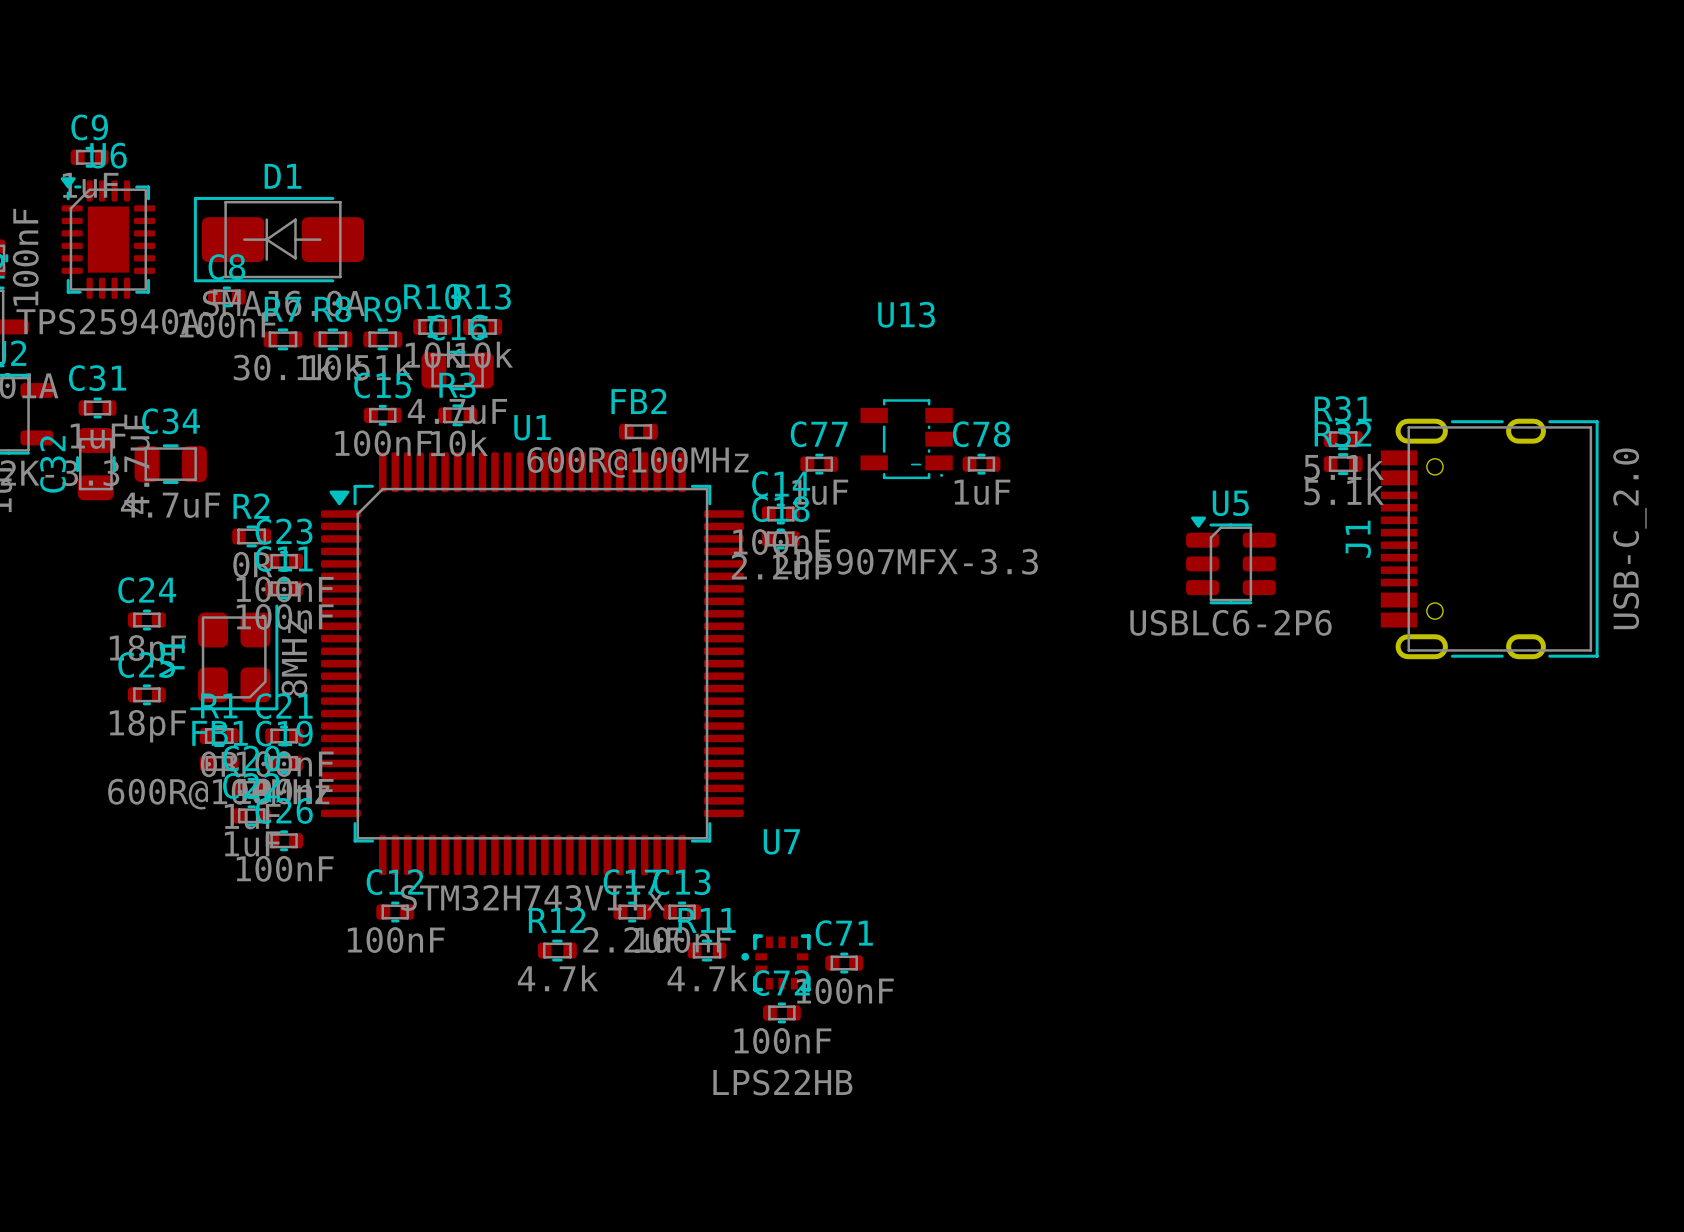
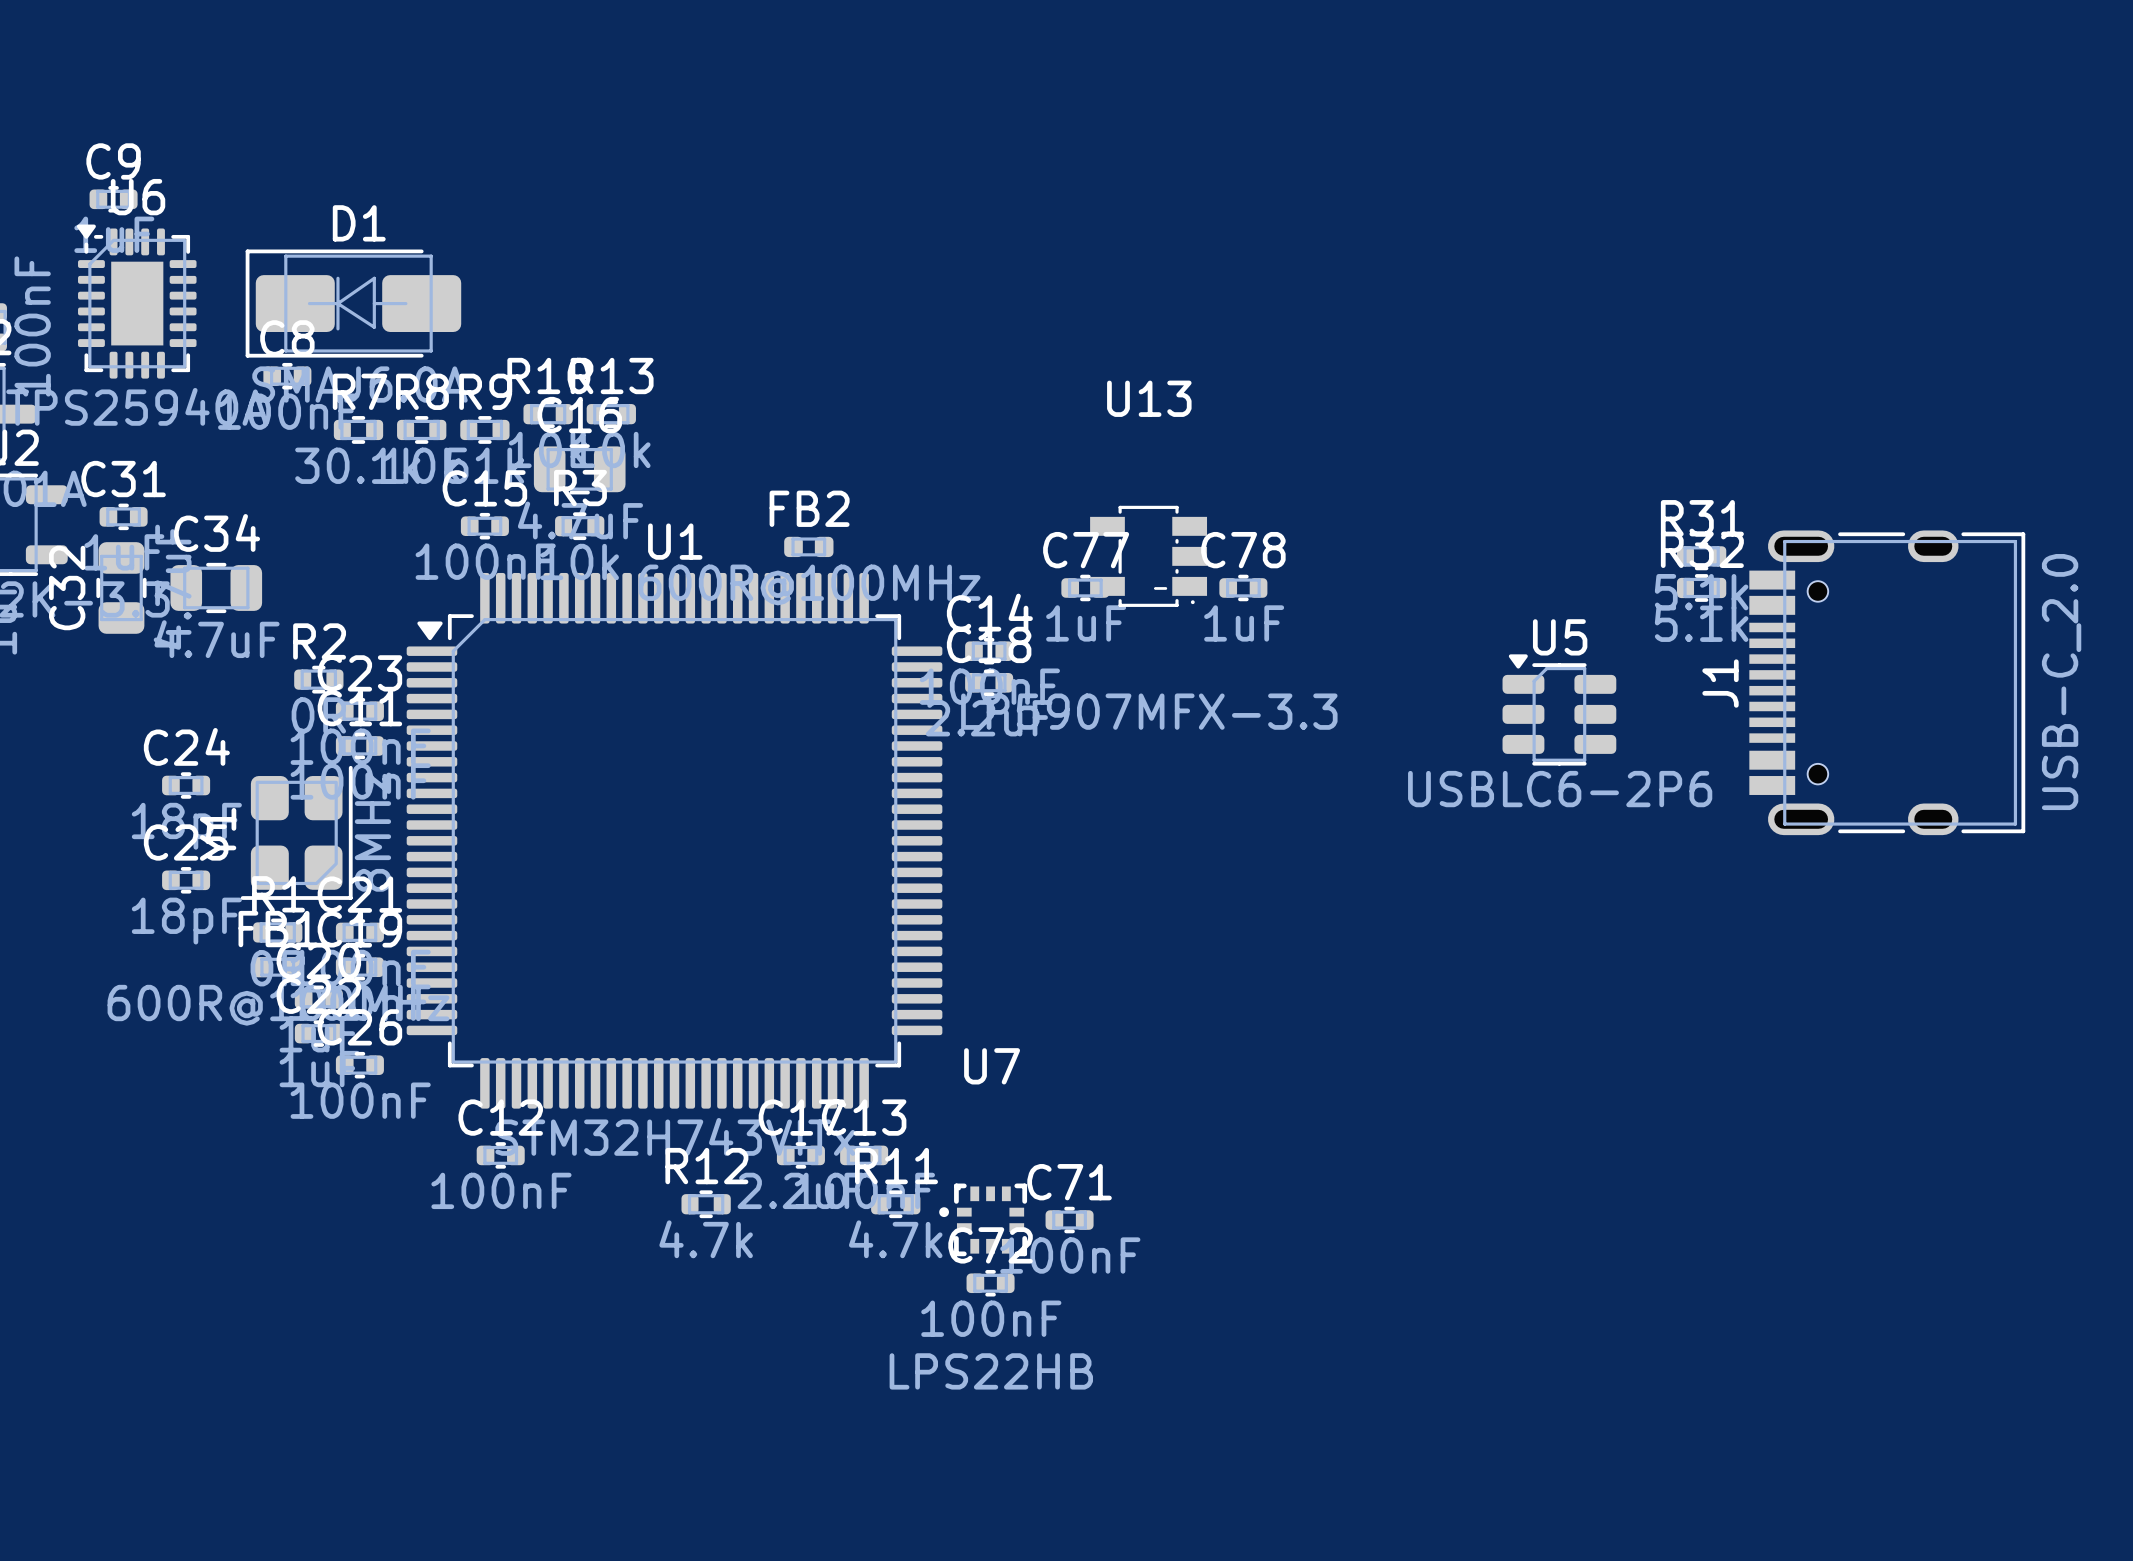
C77 position: (819, 464) -> (1085, 587)

